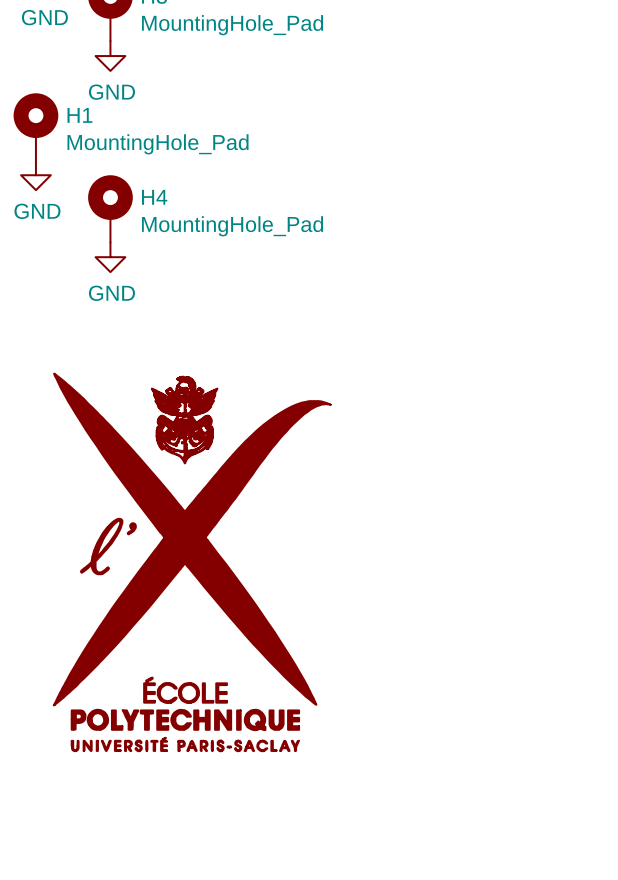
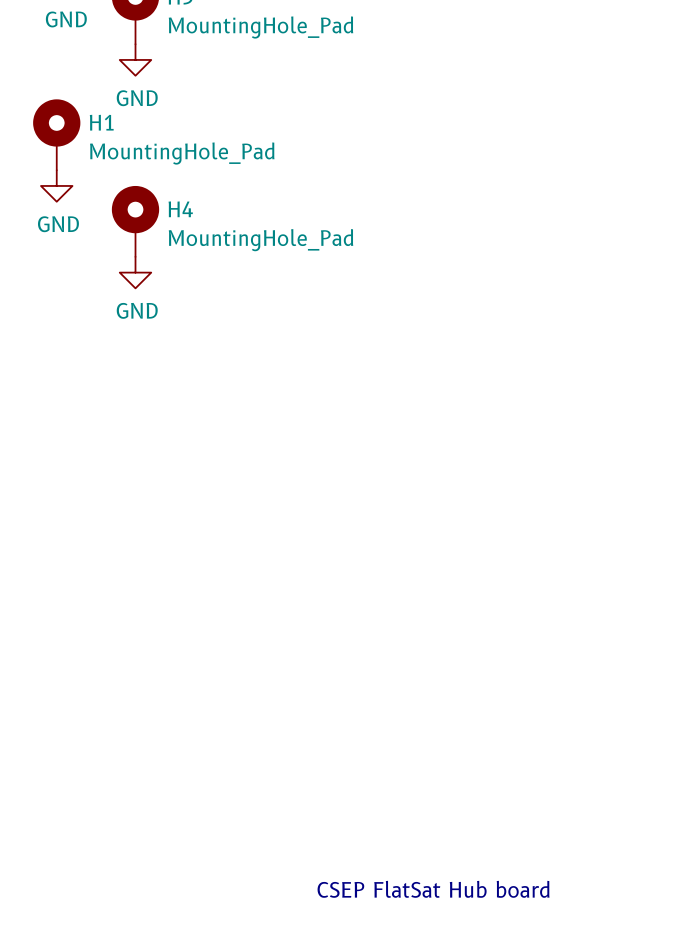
power symbol: (192, 562) -> none
text: none -> CSEP FlatSat Hub board (433, 889)

